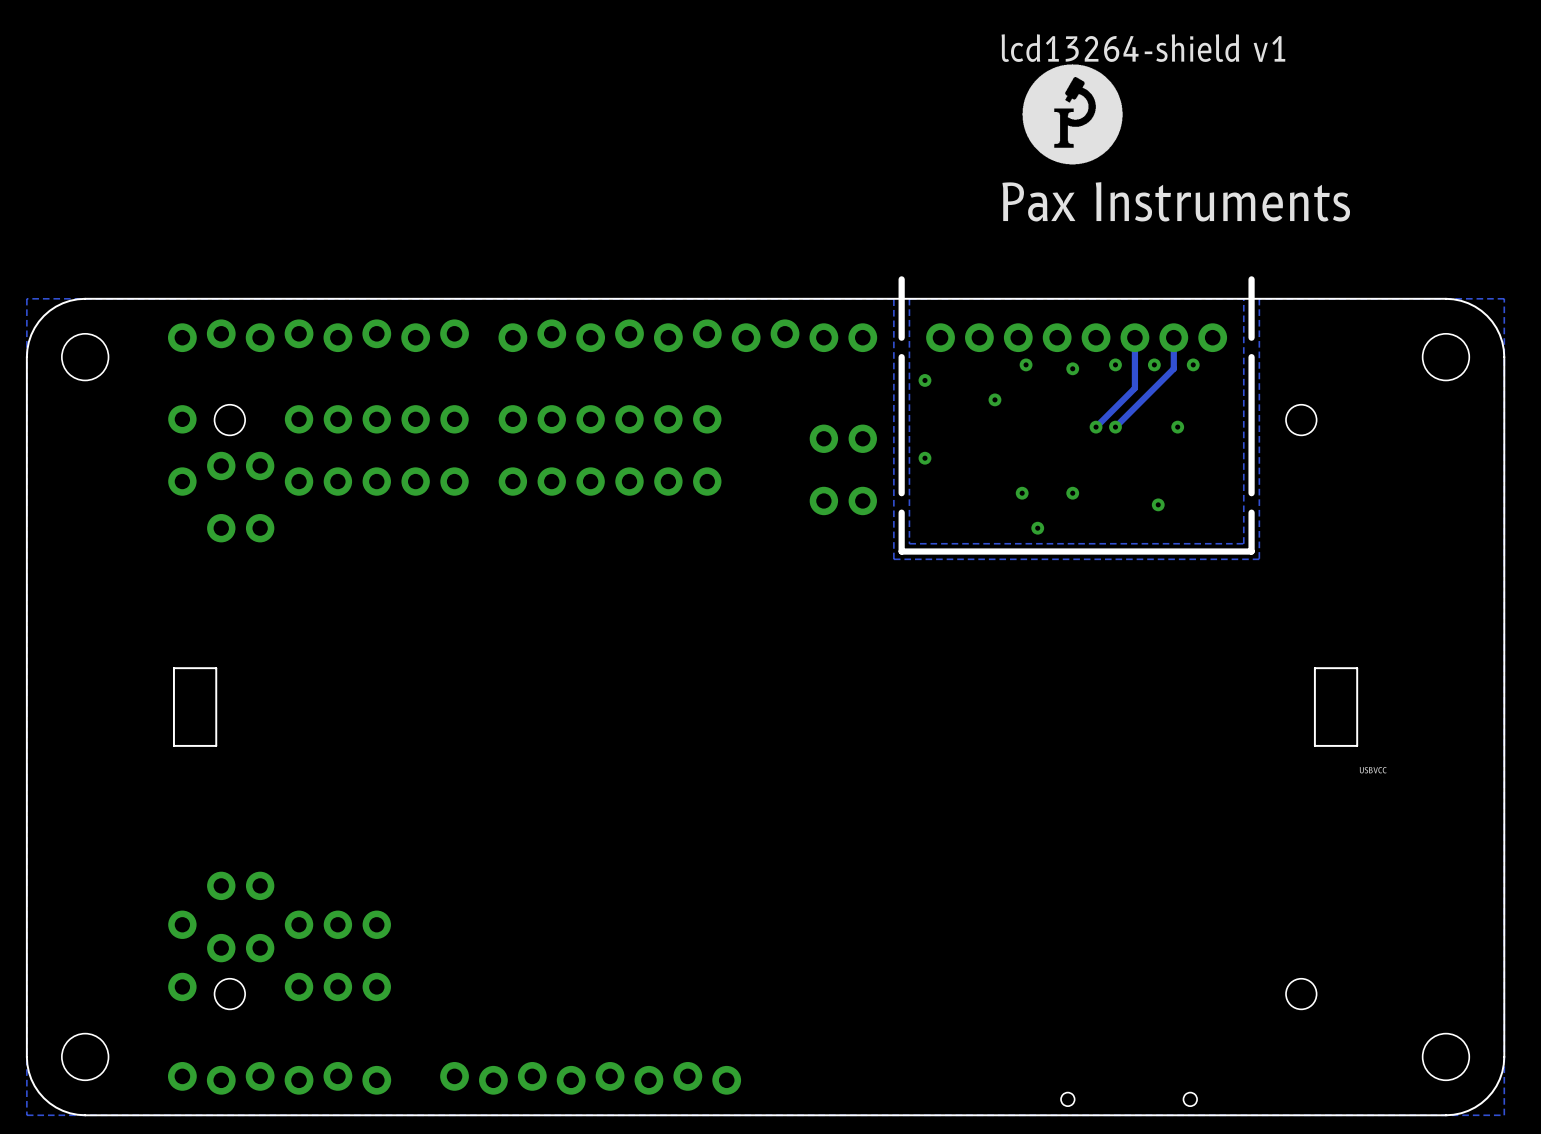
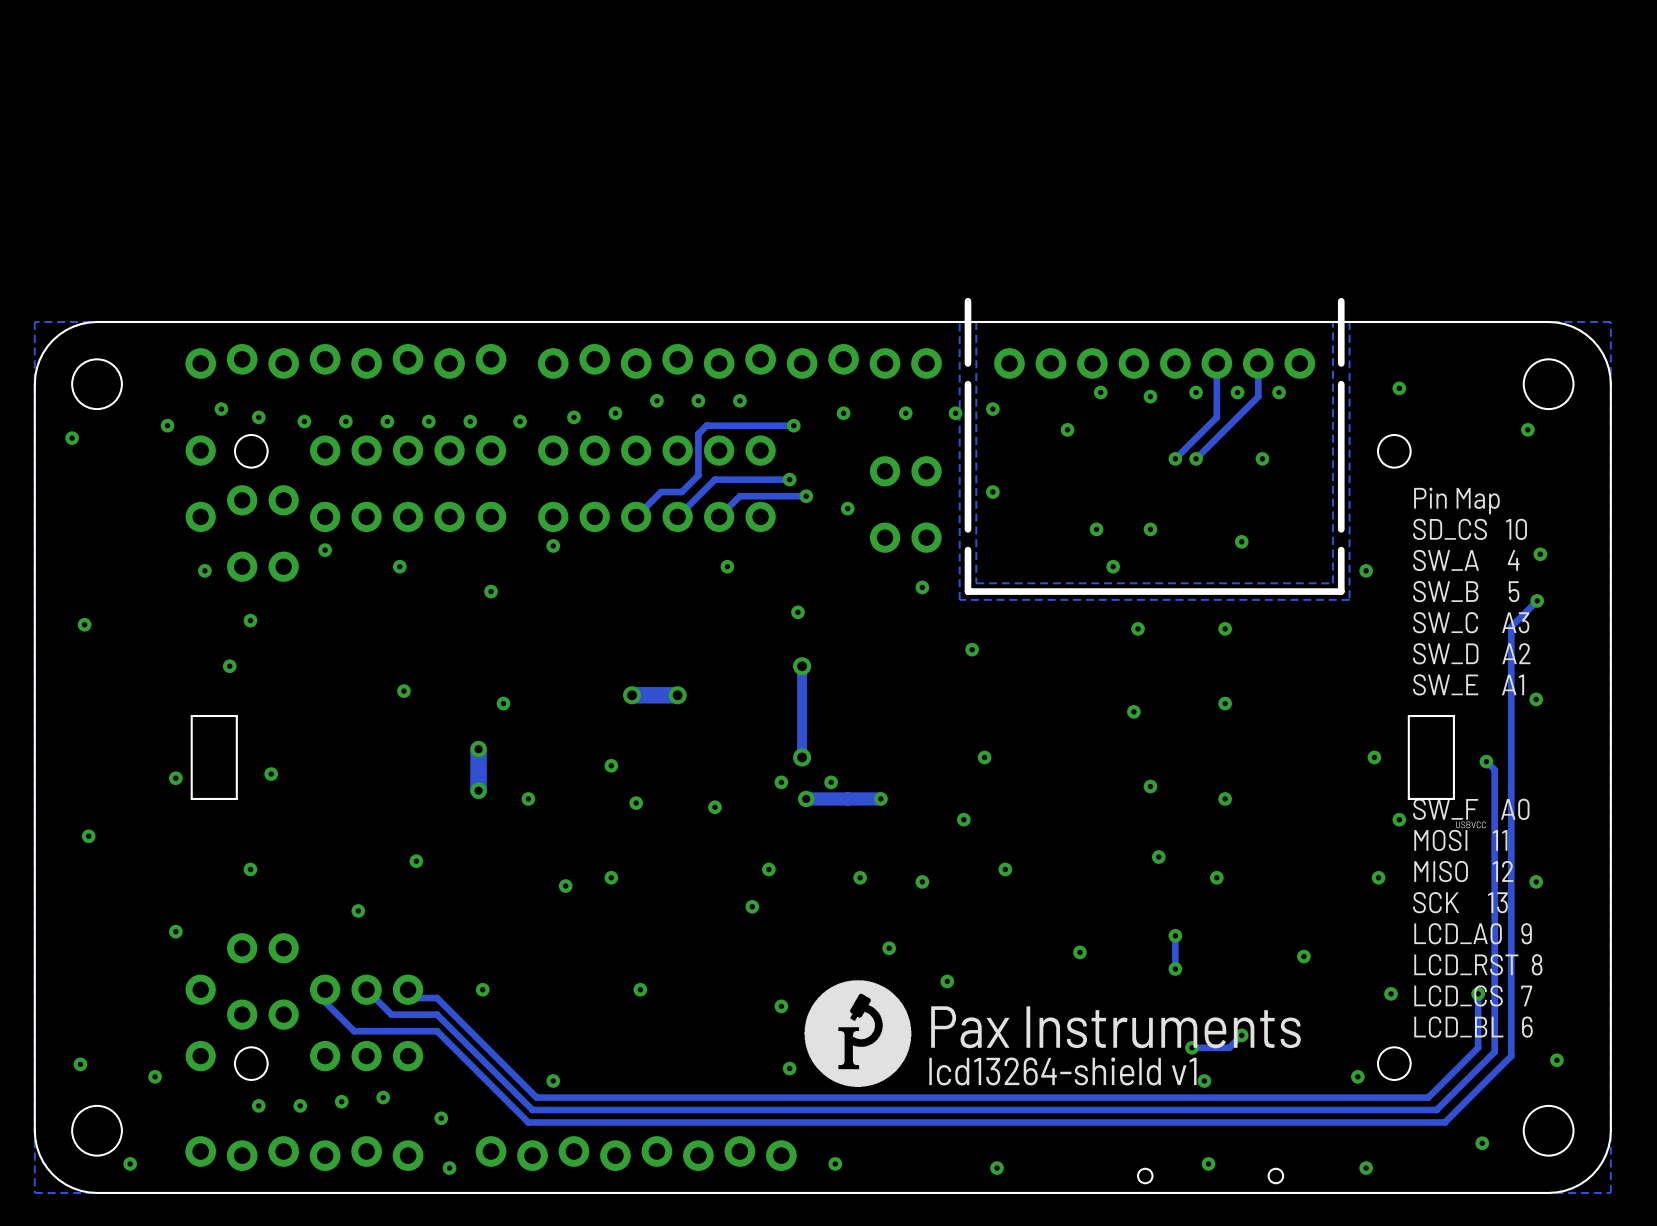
text: lcd13264-shield v1 (1143, 48) -> none
drawing: [1022, 64, 1123, 165] -> none
text: Pax Instruments (1176, 201) -> none
via: none -> (1399, 388)
via: none -> (656, 400)
via: none -> (698, 400)
via: none -> (739, 400)
via: none -> (221, 409)
via: none -> (615, 413)
via: none -> (843, 413)
via: none -> (905, 413)
via: none -> (955, 413)
via: none -> (258, 417)
via: none -> (573, 417)
via: none -> (304, 421)
via: none -> (345, 421)
via: none -> (387, 421)
via: none -> (428, 421)
via: none -> (470, 421)
via: none -> (520, 421)
via: none -> (167, 425)
track: none -> (793, 425) (706, 425) (698, 433) (698, 475) (681, 492) (661, 492) (636, 516)
via: none -> (793, 425)
via: none -> (1527, 429)
via: none -> (72, 438)
track: none -> (789, 479) (714, 479) (677, 516)
via: none -> (789, 479)
track: none -> (806, 496) (739, 496) (719, 516)
via: none -> (806, 496)
text: none -> Pin Map (1456, 500)
via: none -> (847, 508)
text: none -> SD_CS 10 (1470, 529)
via: none -> (553, 545)
via: none -> (325, 550)
via: none -> (1540, 554)
text: none -> SW_A 4 (1466, 560)
via: none -> (399, 566)
via: none -> (727, 566)
via: none -> (204, 570)
via: none -> (1366, 570)
via: none -> (922, 587)
via: none -> (491, 591)
text: none -> SW_B 5 (1466, 591)
track: none -> (1537, 600) (1511, 626) (1511, 1056) (1444, 1122) (528, 1122) (437, 1031) (354, 1031) (325, 1002) (325, 989)
via: none -> (1537, 600)
via: none -> (797, 612)
via: none -> (250, 620)
via: none -> (84, 624)
text: none -> SW_C A3 (1471, 622)
via: none -> (1138, 628)
via: none -> (1225, 628)
via: none -> (972, 649)
text: none -> SW_D A2 (1471, 653)
via: none -> (229, 666)
track: none -> (802, 666) (802, 757)
via: none -> (802, 666)
text: none -> SW_E A1 (1468, 684)
via: none -> (403, 691)
via: none -> (632, 695)
track: none -> (677, 695) (632, 695)
via: none -> (677, 695)
via: none -> (1536, 699)
via: none -> (503, 703)
via: none -> (1225, 703)
via: none -> (1133, 711)
track: none -> (478, 749) (478, 790)
via: none -> (478, 749)
via: none -> (802, 757)
via: none -> (984, 757)
via: none -> (1374, 757)
track: none -> (1486, 761) (1494, 769) (1494, 1051) (1436, 1110) (532, 1110) (437, 1014) (391, 1014) (366, 989)
via: none -> (1486, 761)
via: none -> (611, 765)
via: none -> (271, 774)
via: none -> (175, 778)
via: none -> (781, 782)
via: none -> (831, 782)
via: none -> (1150, 786)
via: none -> (478, 790)
via: none -> (528, 798)
via: none -> (806, 798)
track: none -> (880, 798) (806, 798)
via: none -> (880, 798)
via: none -> (1225, 798)
via: none -> (636, 803)
via: none -> (714, 807)
text: none -> SW_F A0 (1471, 809)
via: none -> (963, 819)
via: none -> (1399, 819)
via: none -> (88, 836)
text: none -> MOSI 11 (1460, 840)
via: none -> (1158, 857)
via: none -> (416, 861)
via: none -> (250, 869)
via: none -> (768, 869)
via: none -> (1005, 869)
text: none -> MISO 12 (1463, 871)
via: none -> (611, 877)
via: none -> (860, 877)
via: none -> (1216, 877)
via: none -> (1378, 877)
via: none -> (922, 881)
via: none -> (1536, 881)
via: none -> (565, 886)
text: none -> SCK 13 (1460, 902)
via: none -> (752, 906)
via: none -> (358, 910)
via: none -> (175, 931)
track: none -> (1175, 935) (1175, 969)
via: none -> (1175, 935)
text: none -> LCD_A0 9 (1473, 933)
via: none -> (889, 948)
via: none -> (1079, 952)
via: none -> (1303, 956)
text: none -> LCD_RST 8 (1478, 964)
via: none -> (1175, 969)
drawing: none -> [804, 979, 912, 1087]
via: none -> (947, 981)
track: none -> (408, 989) (416, 998) (437, 998) (536, 1097) (1428, 1097) (1478, 1047) (1478, 993)
via: none -> (482, 989)
via: none -> (640, 989)
via: none -> (1391, 993)
via: none -> (1478, 993)
text: none -> LCD_CS 7 (1473, 995)
via: none -> (781, 1006)
text: none -> Pax Instruments (1115, 1027)
text: none -> LCD_BL 6 (1473, 1027)
track: none -> (1241, 1035) (1229, 1047) (1191, 1047)
via: none -> (1241, 1035)
via: none -> (1191, 1047)
via: none -> (1556, 1060)
via: none -> (80, 1064)
via: none -> (789, 1068)
text: none -> lcd13264-shield v1 (1062, 1071)
via: none -> (155, 1076)
via: none -> (1357, 1076)
via: none -> (553, 1080)
via: none -> (1204, 1080)
via: none -> (383, 1097)
via: none -> (341, 1101)
via: none -> (258, 1105)
via: none -> (300, 1105)
via: none -> (441, 1118)
via: none -> (1482, 1143)
via: none -> (130, 1163)
via: none -> (835, 1163)
via: none -> (1208, 1163)
via: none -> (449, 1168)
via: none -> (997, 1168)
via: none -> (1366, 1168)

